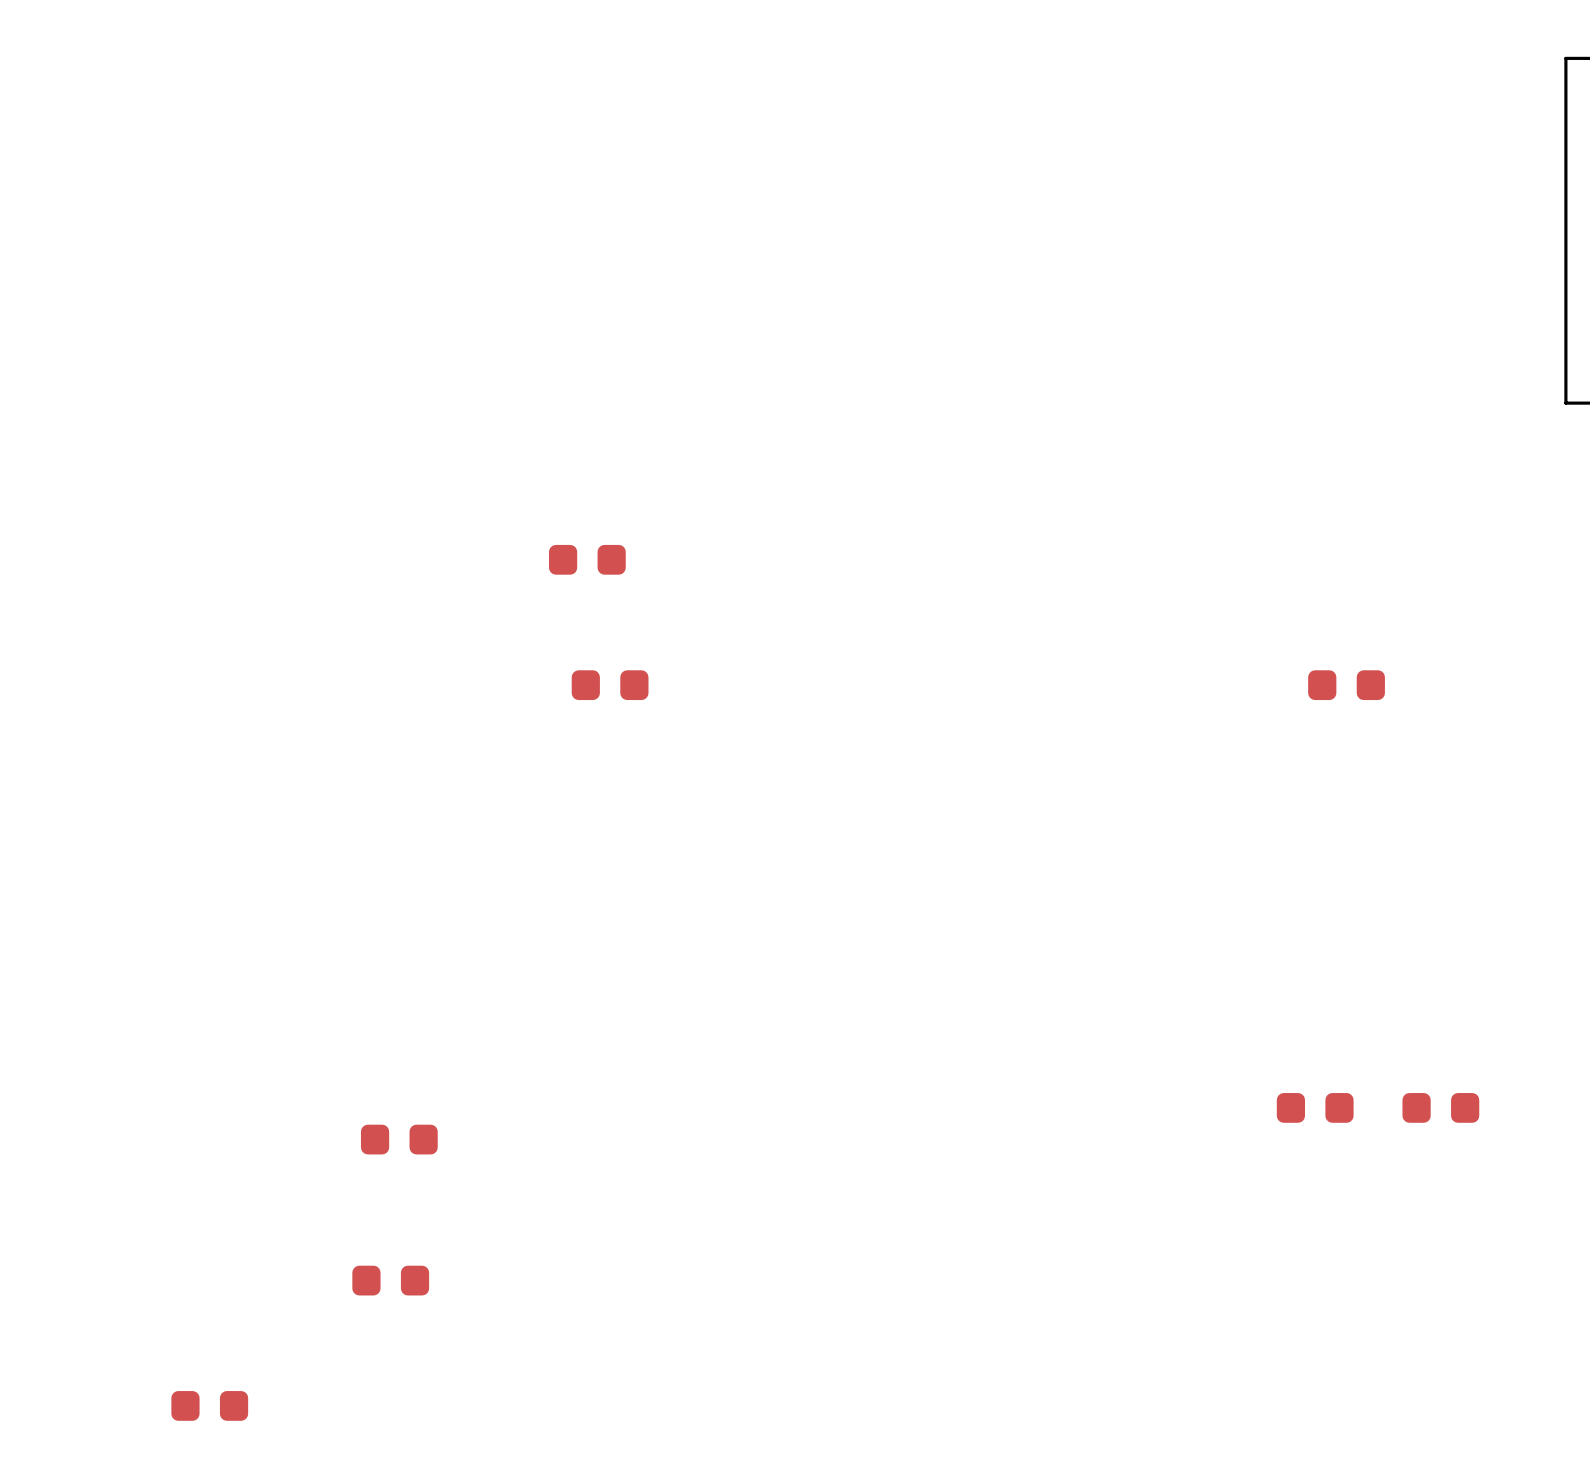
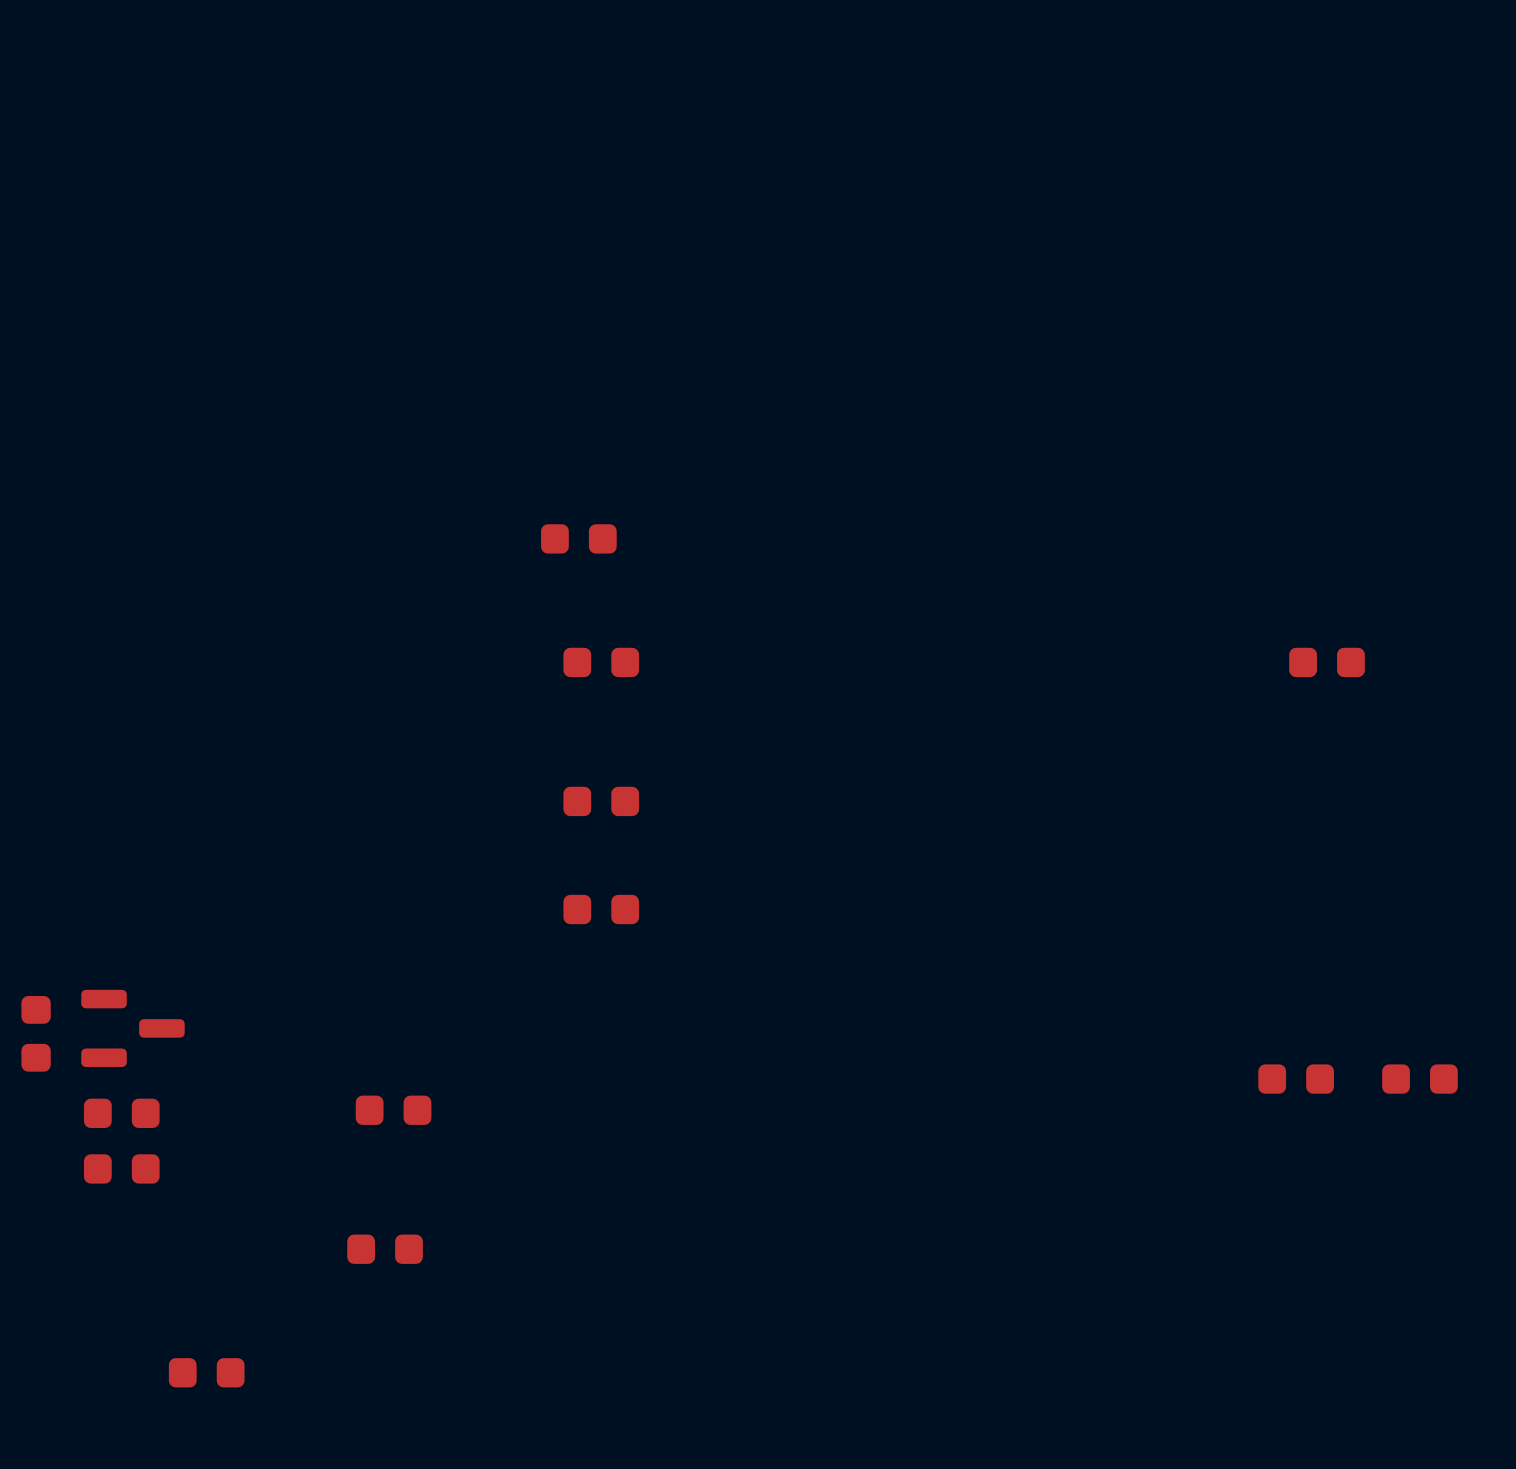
part: none -> (601, 801)
part: none -> (601, 909)
part: none -> (132, 1028)
part: none -> (36, 1033)
part: none -> (121, 1113)
part: none -> (121, 1168)

